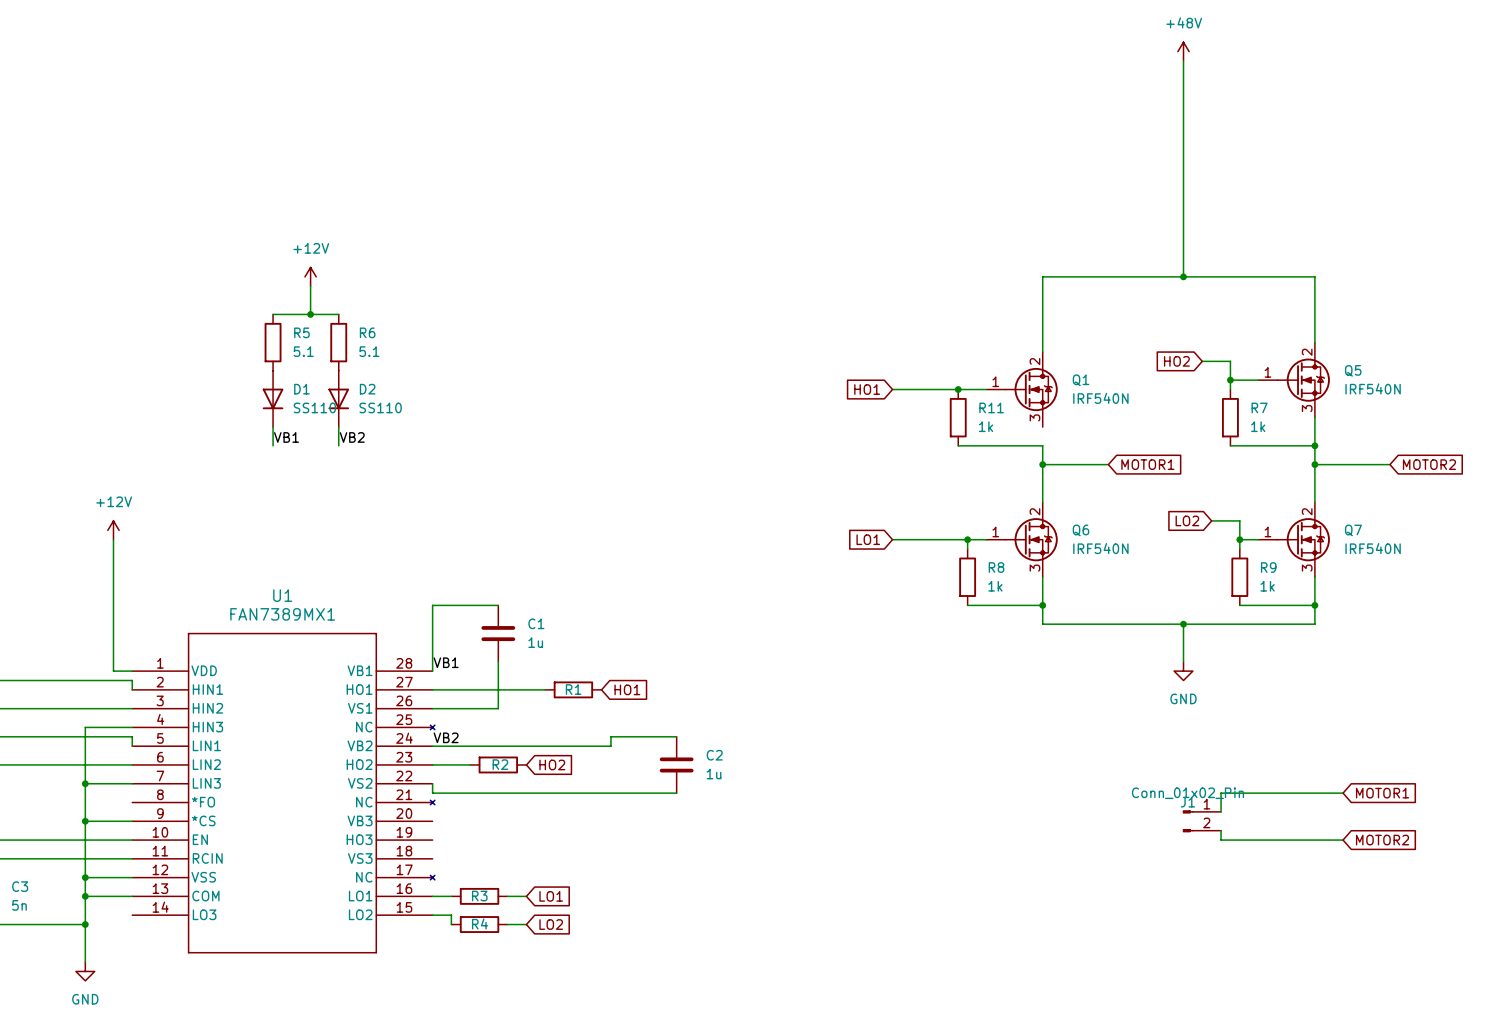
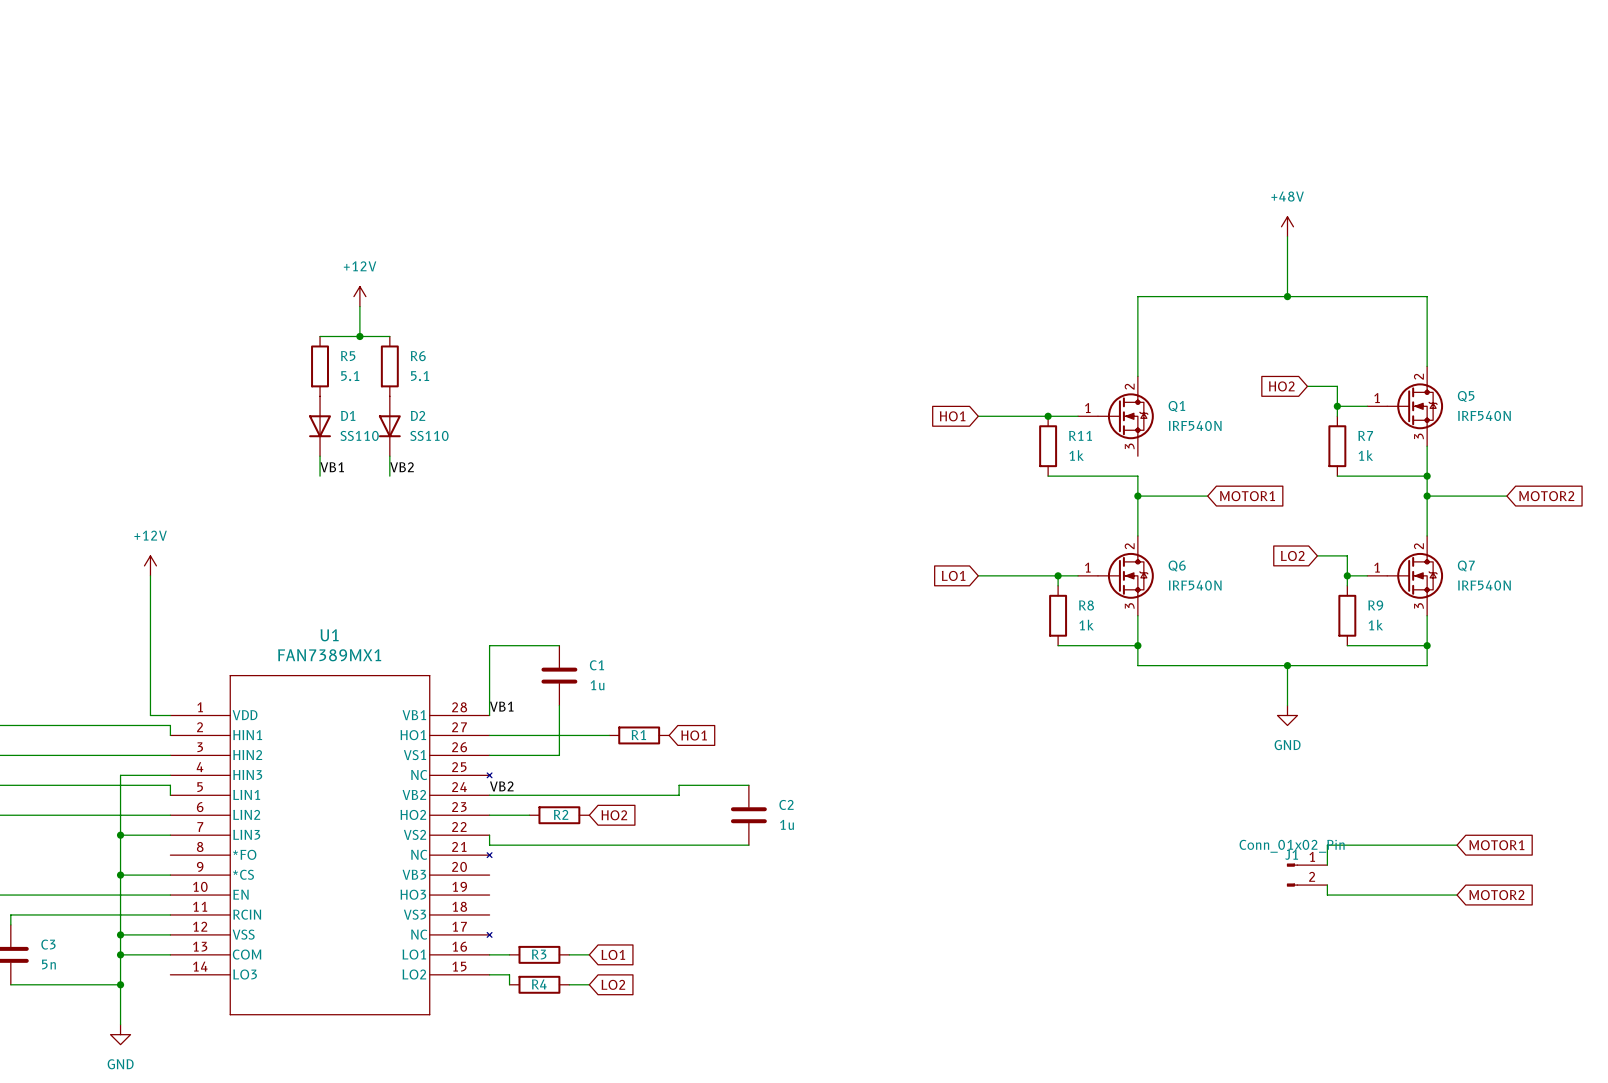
power symbol position: +48V (1183, 51) -> +48V (1287, 226)
wire: (1183, 61) (1183, 220) -> none

